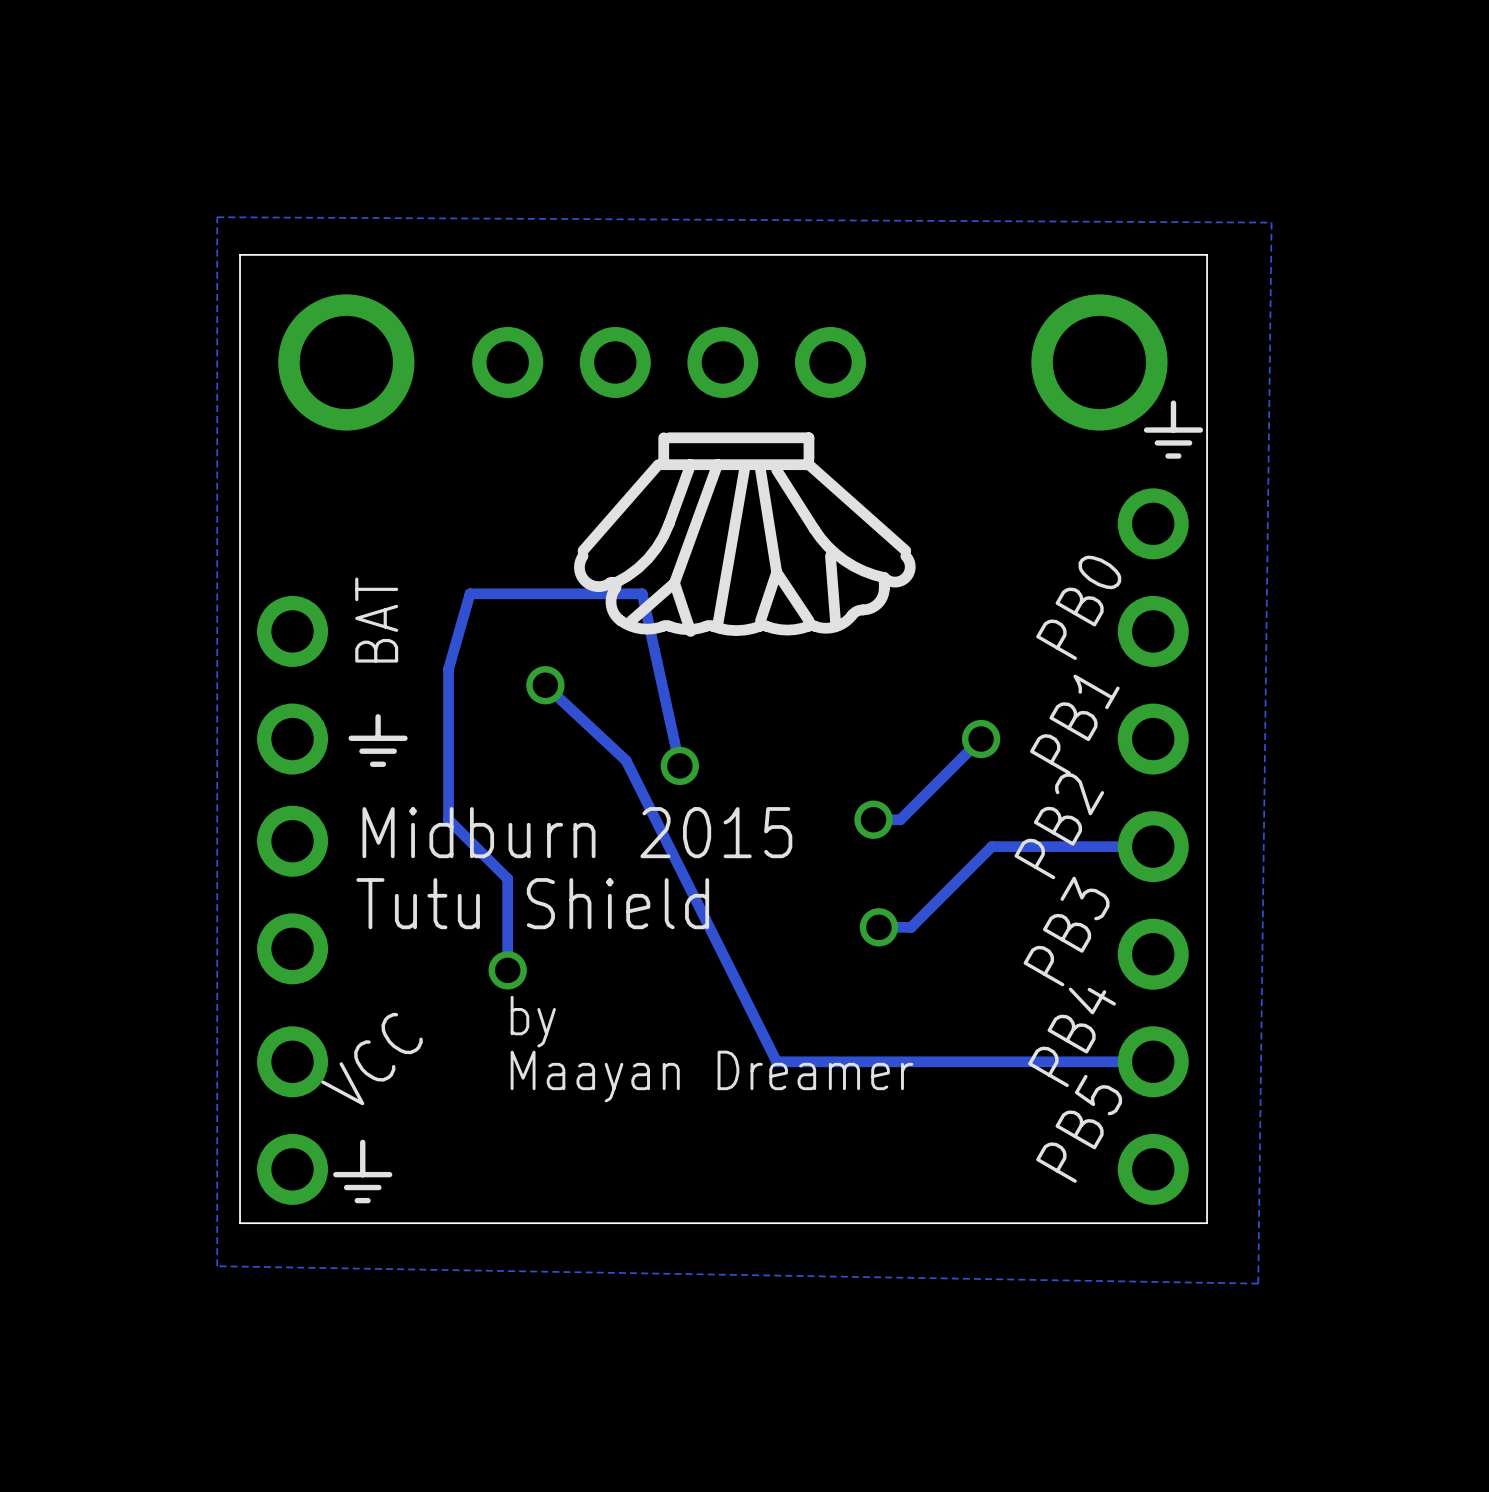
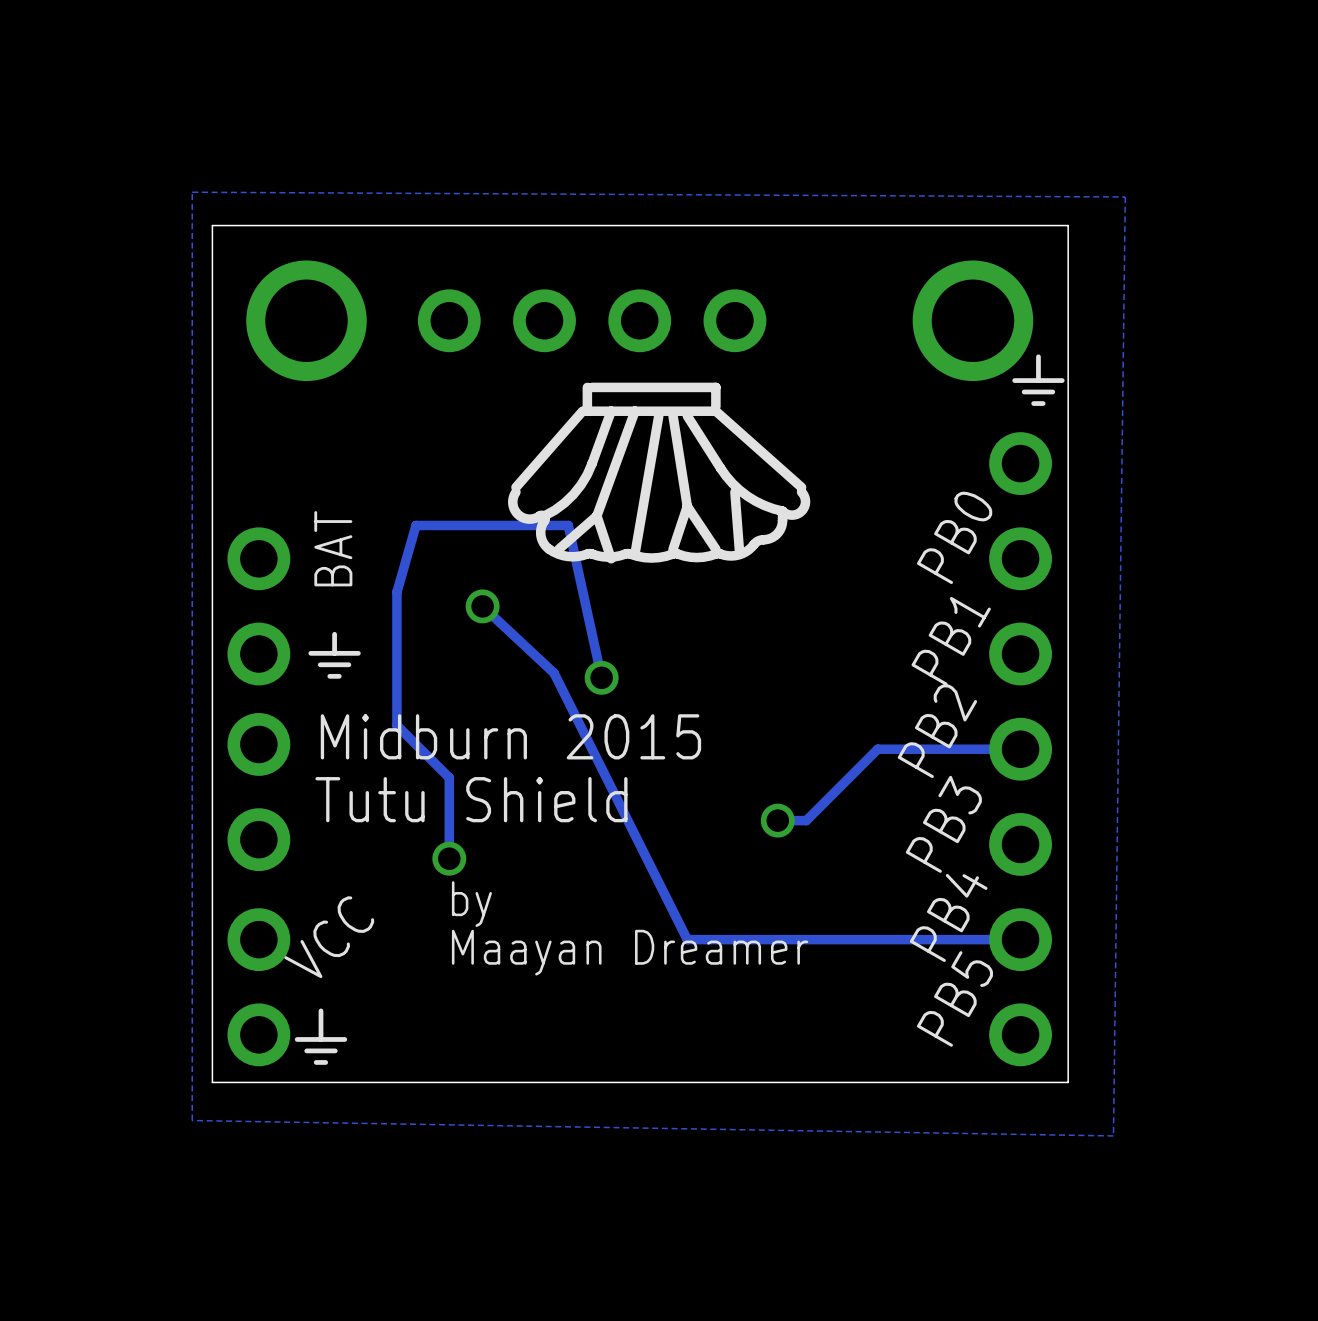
track: (981, 739) (900, 819) (873, 819) -> none
via: (981, 739) -> none
via: (873, 819) -> none

